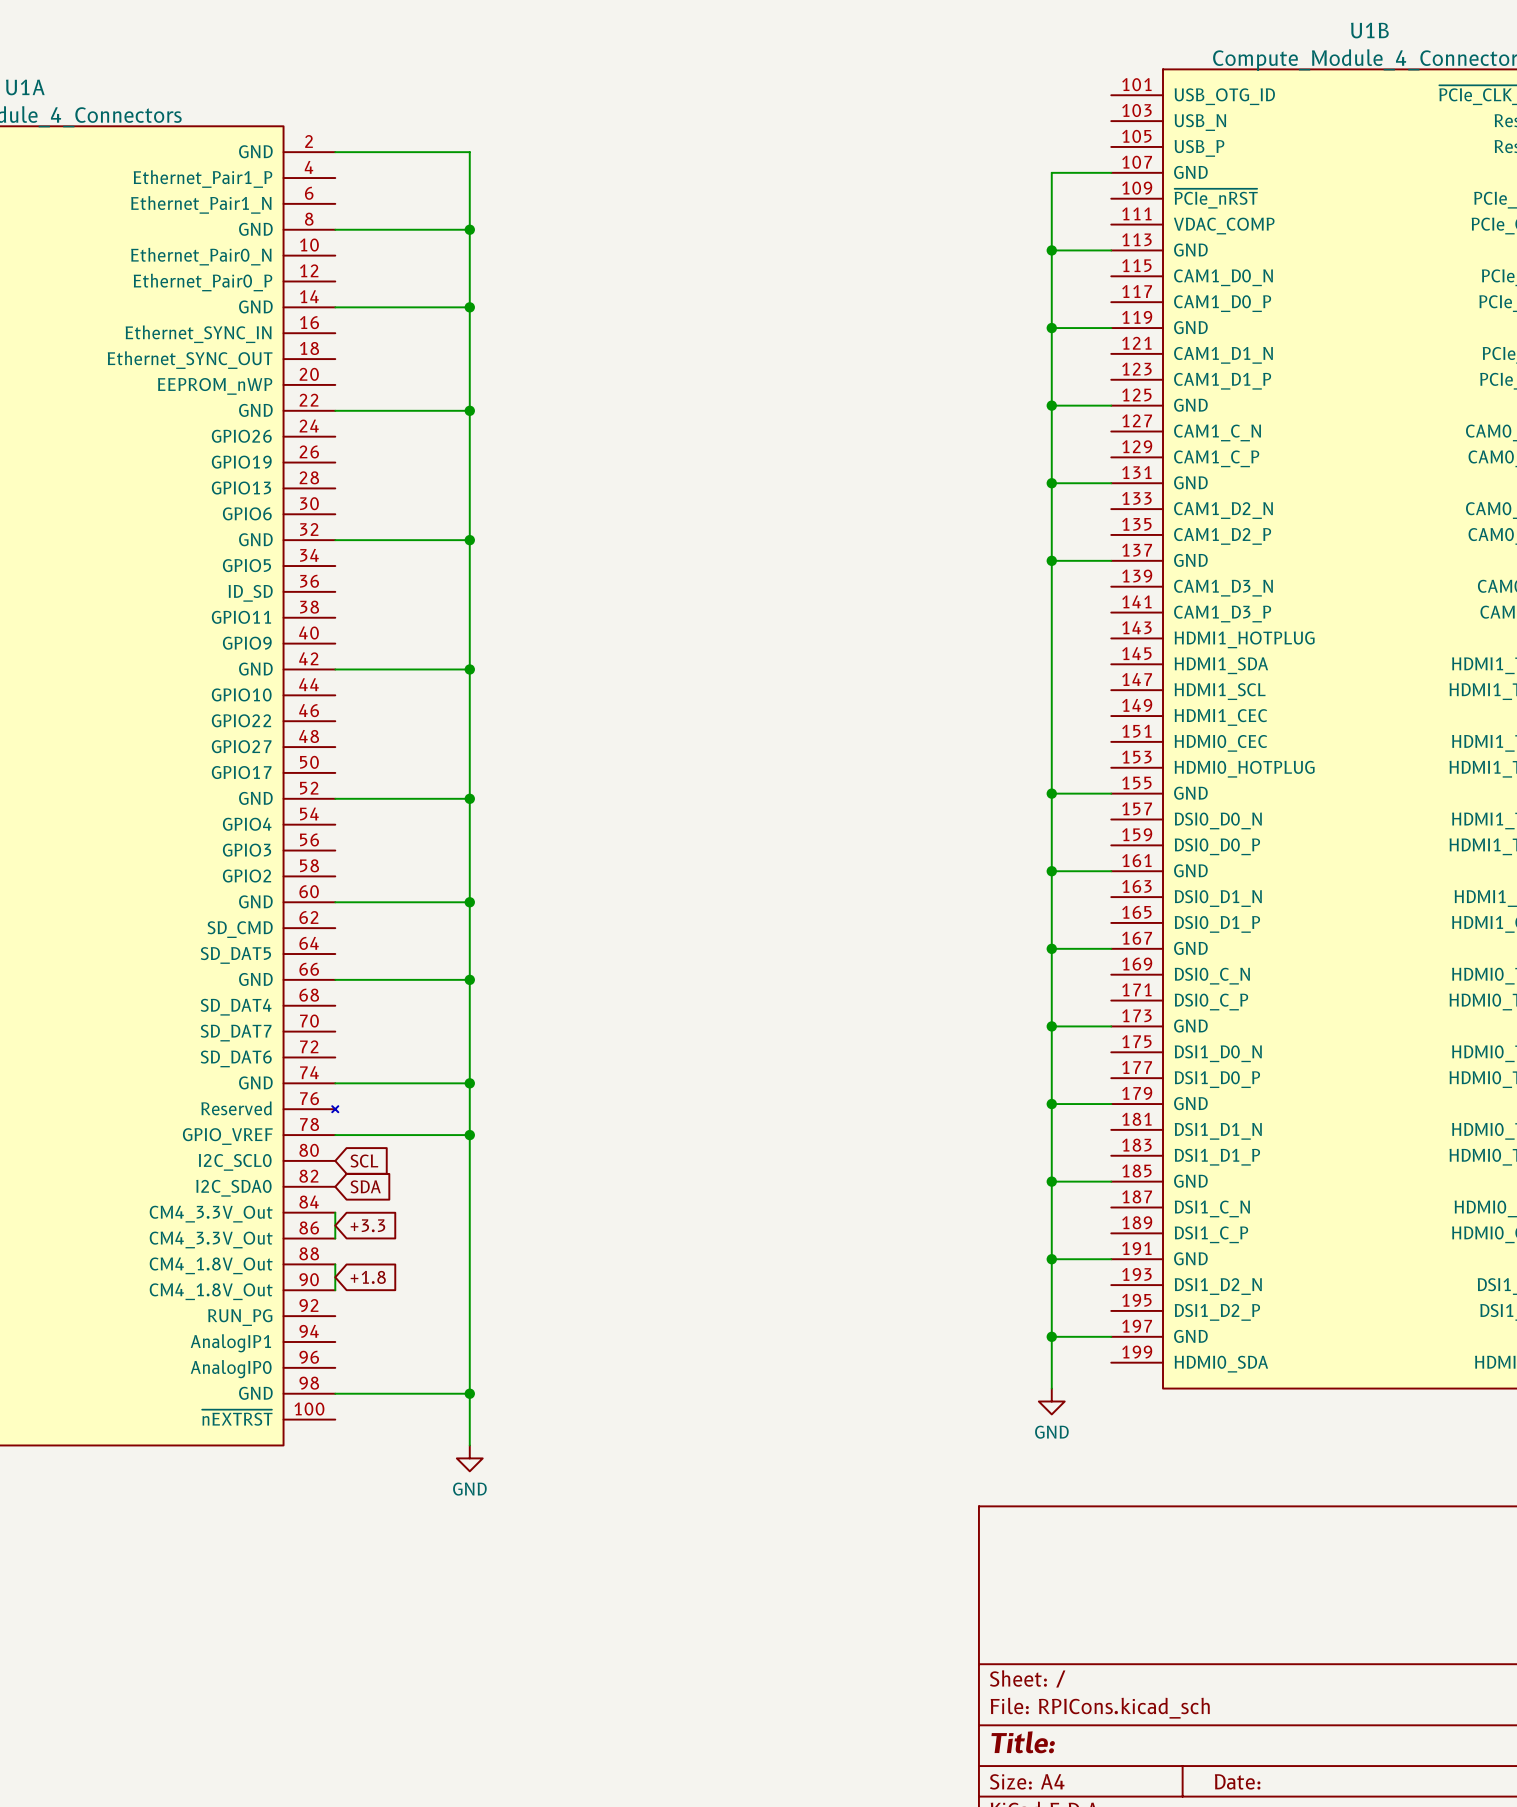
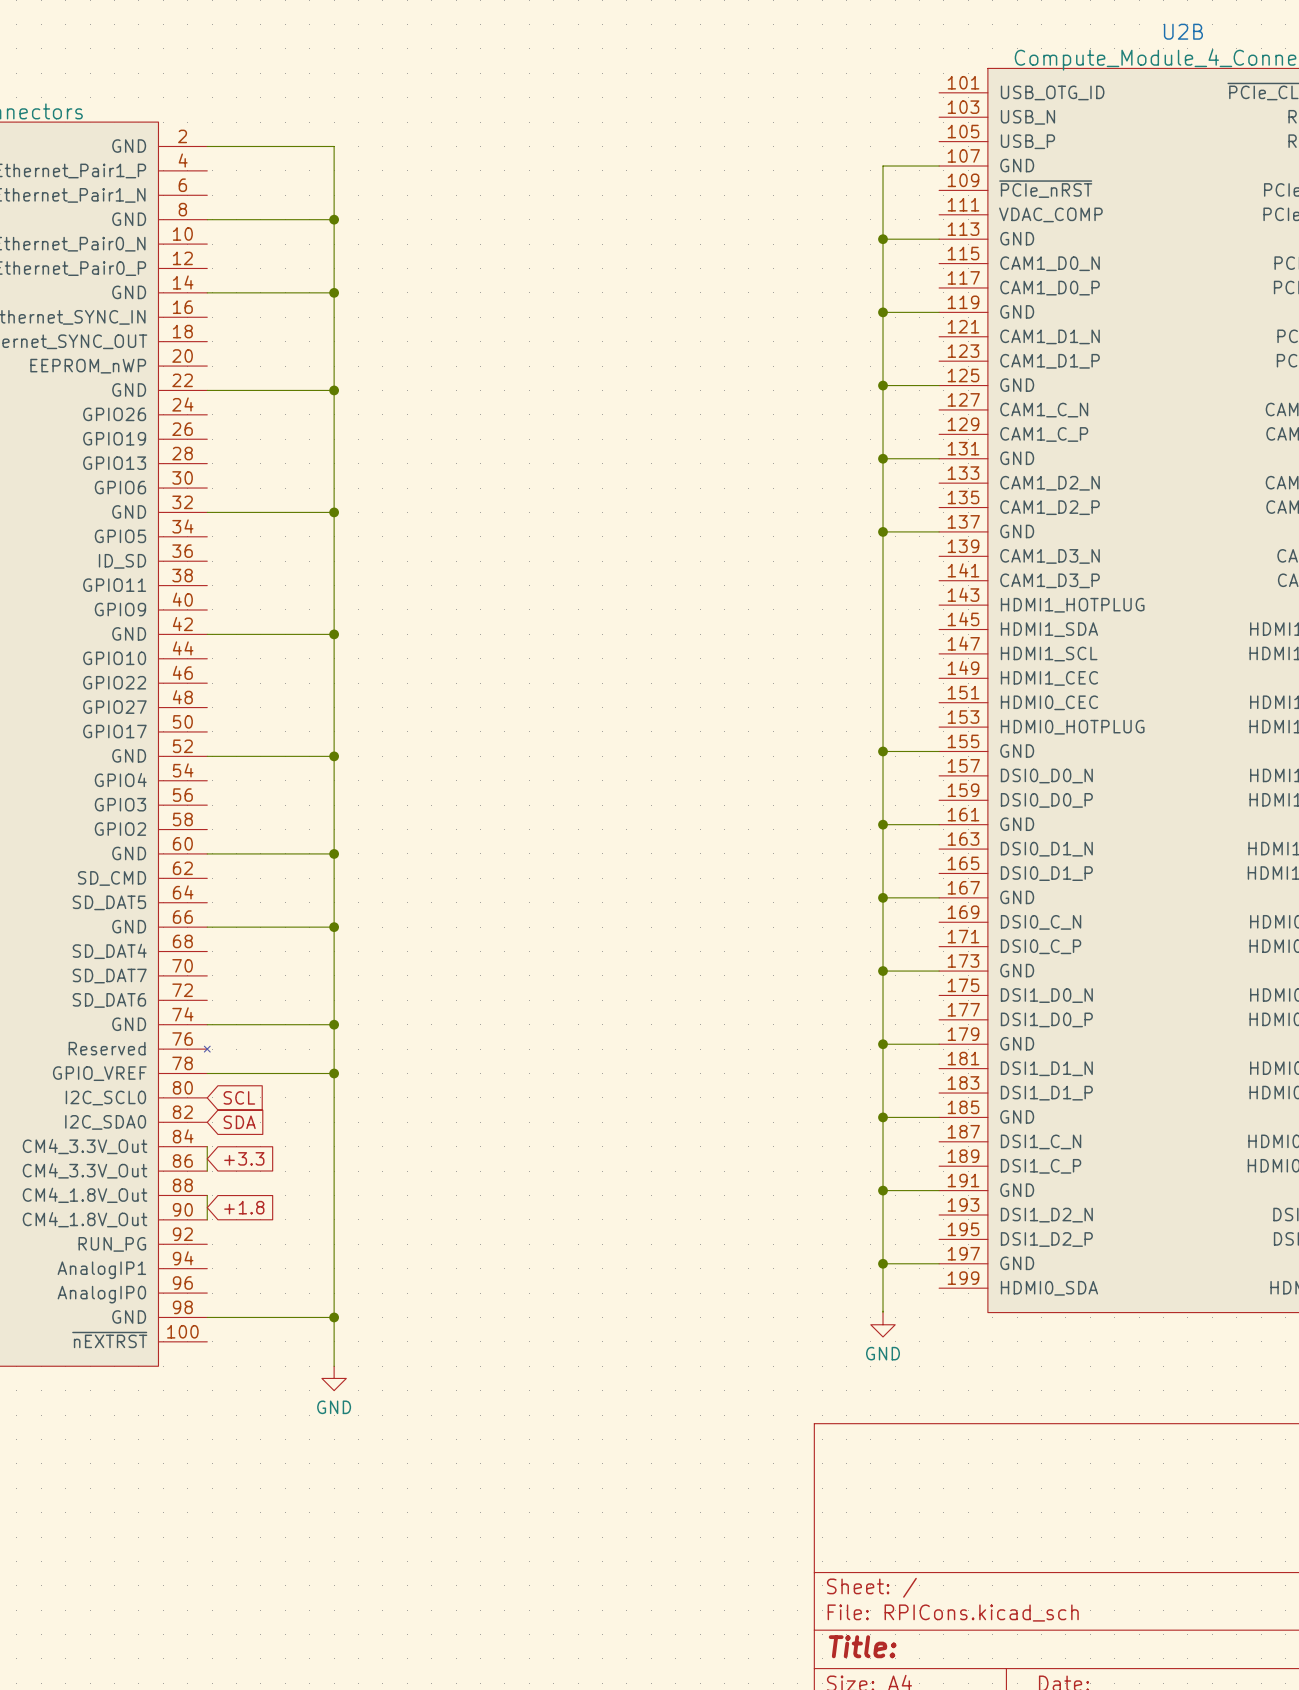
U1B name: U1B (1369, 30) -> U2B (1183, 31)

